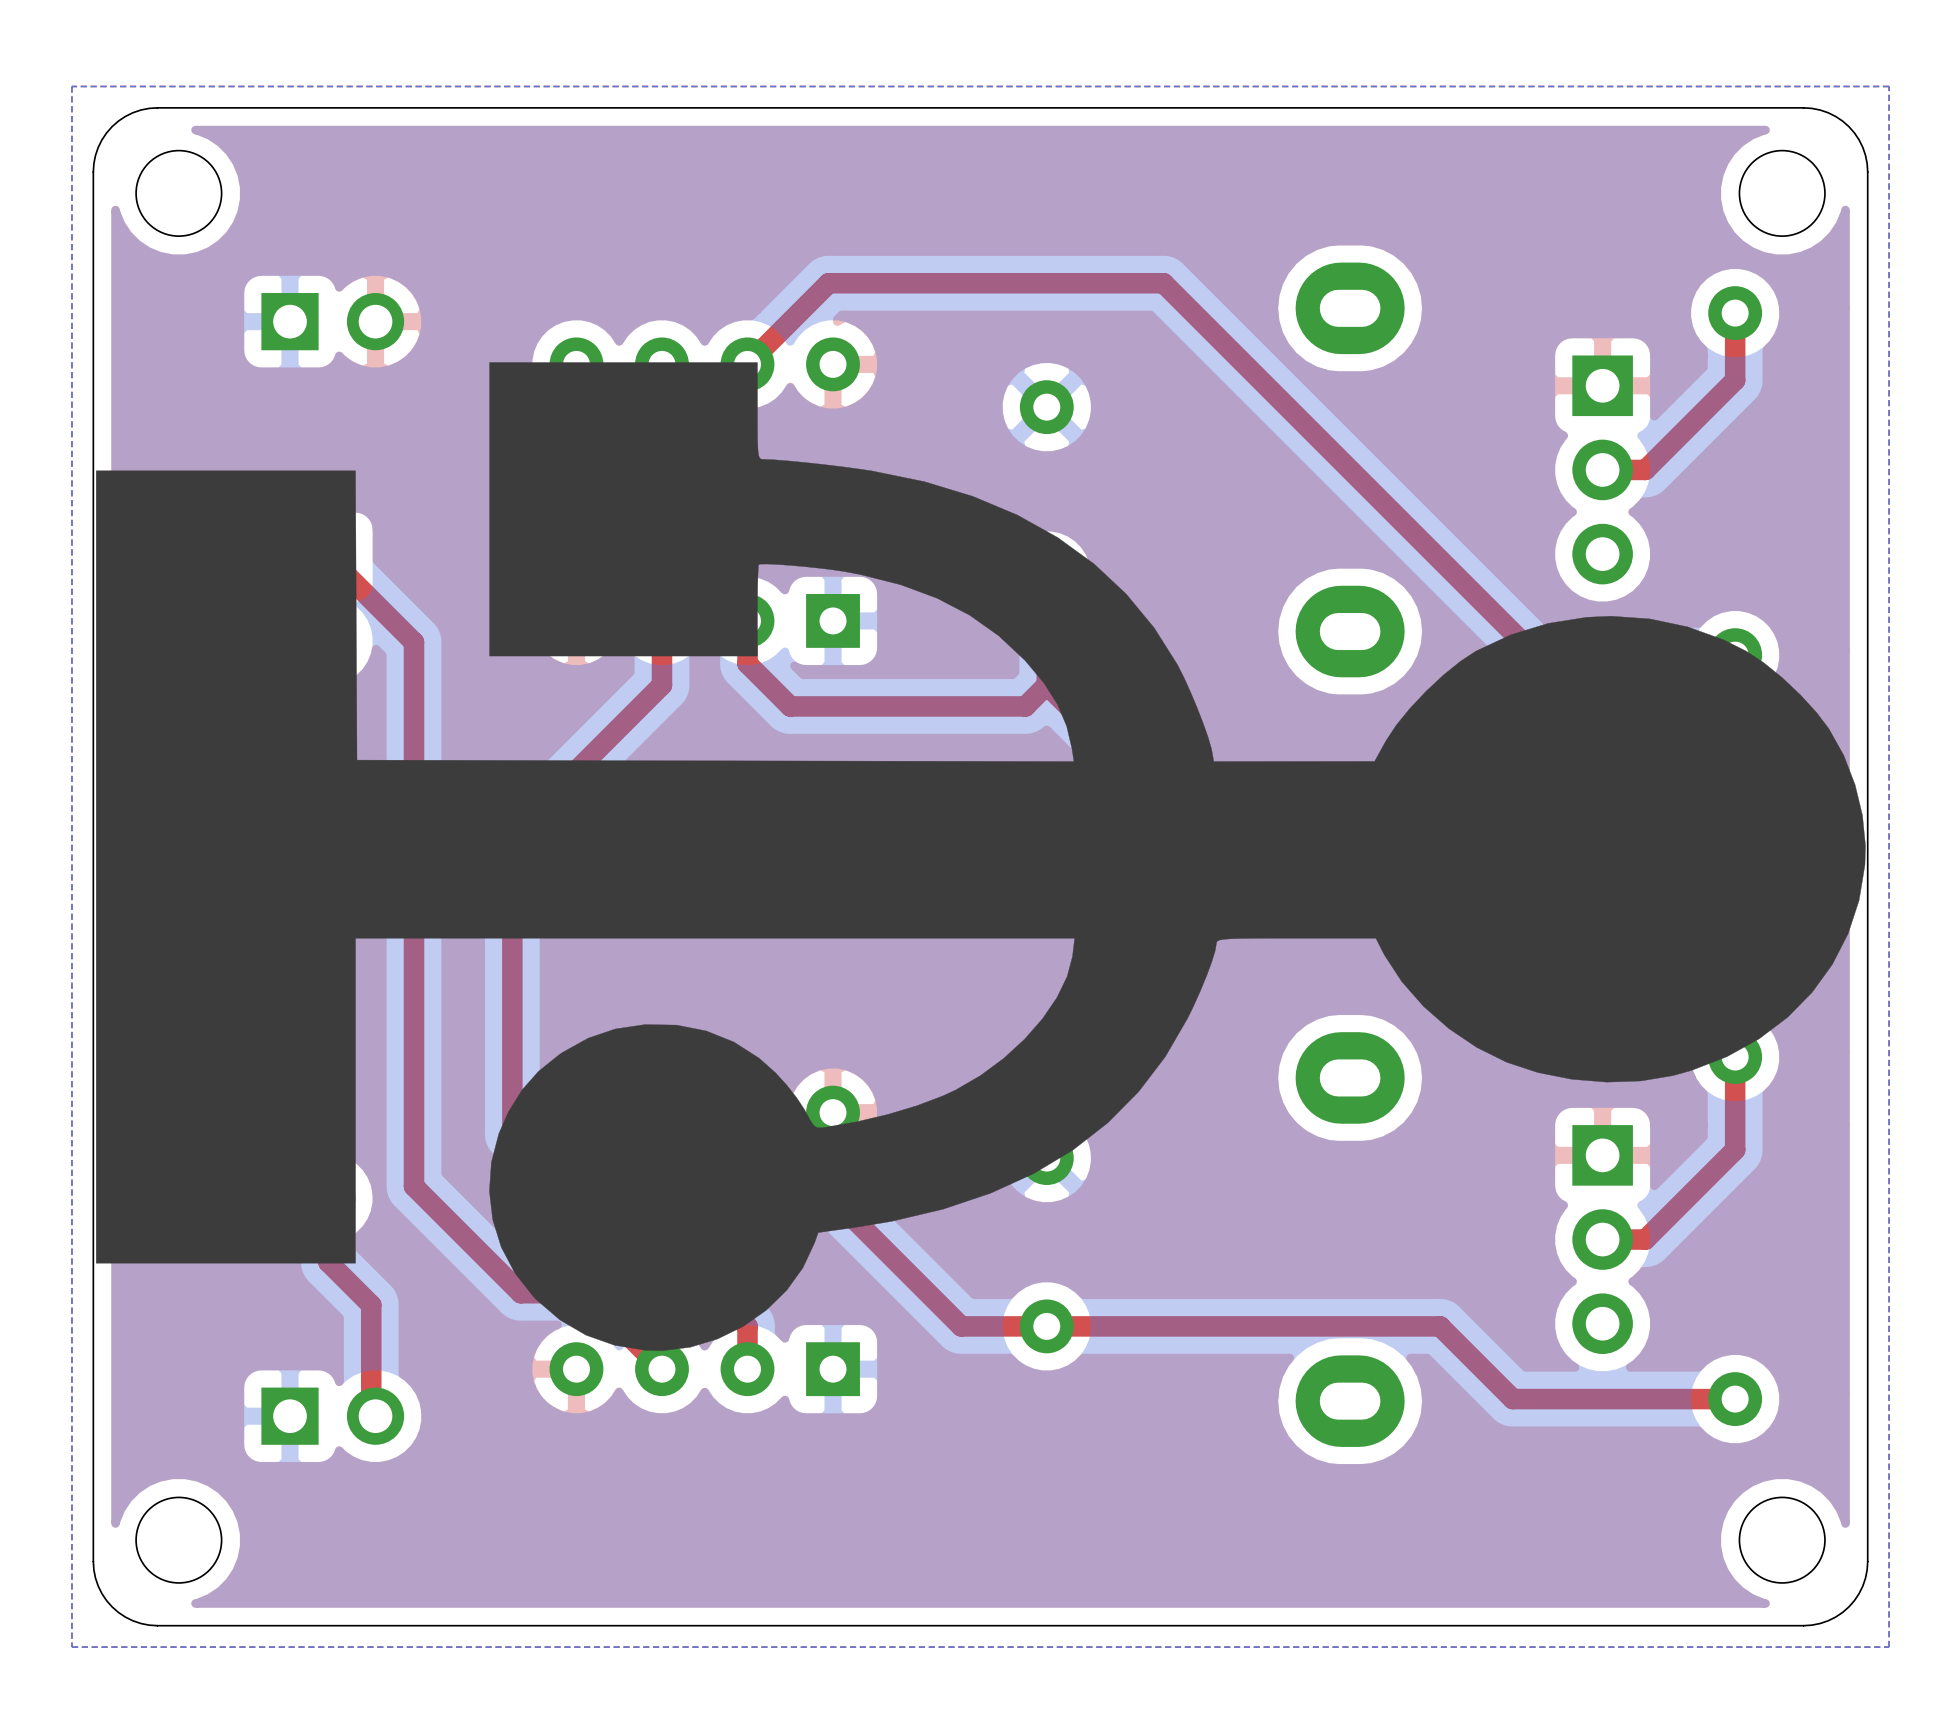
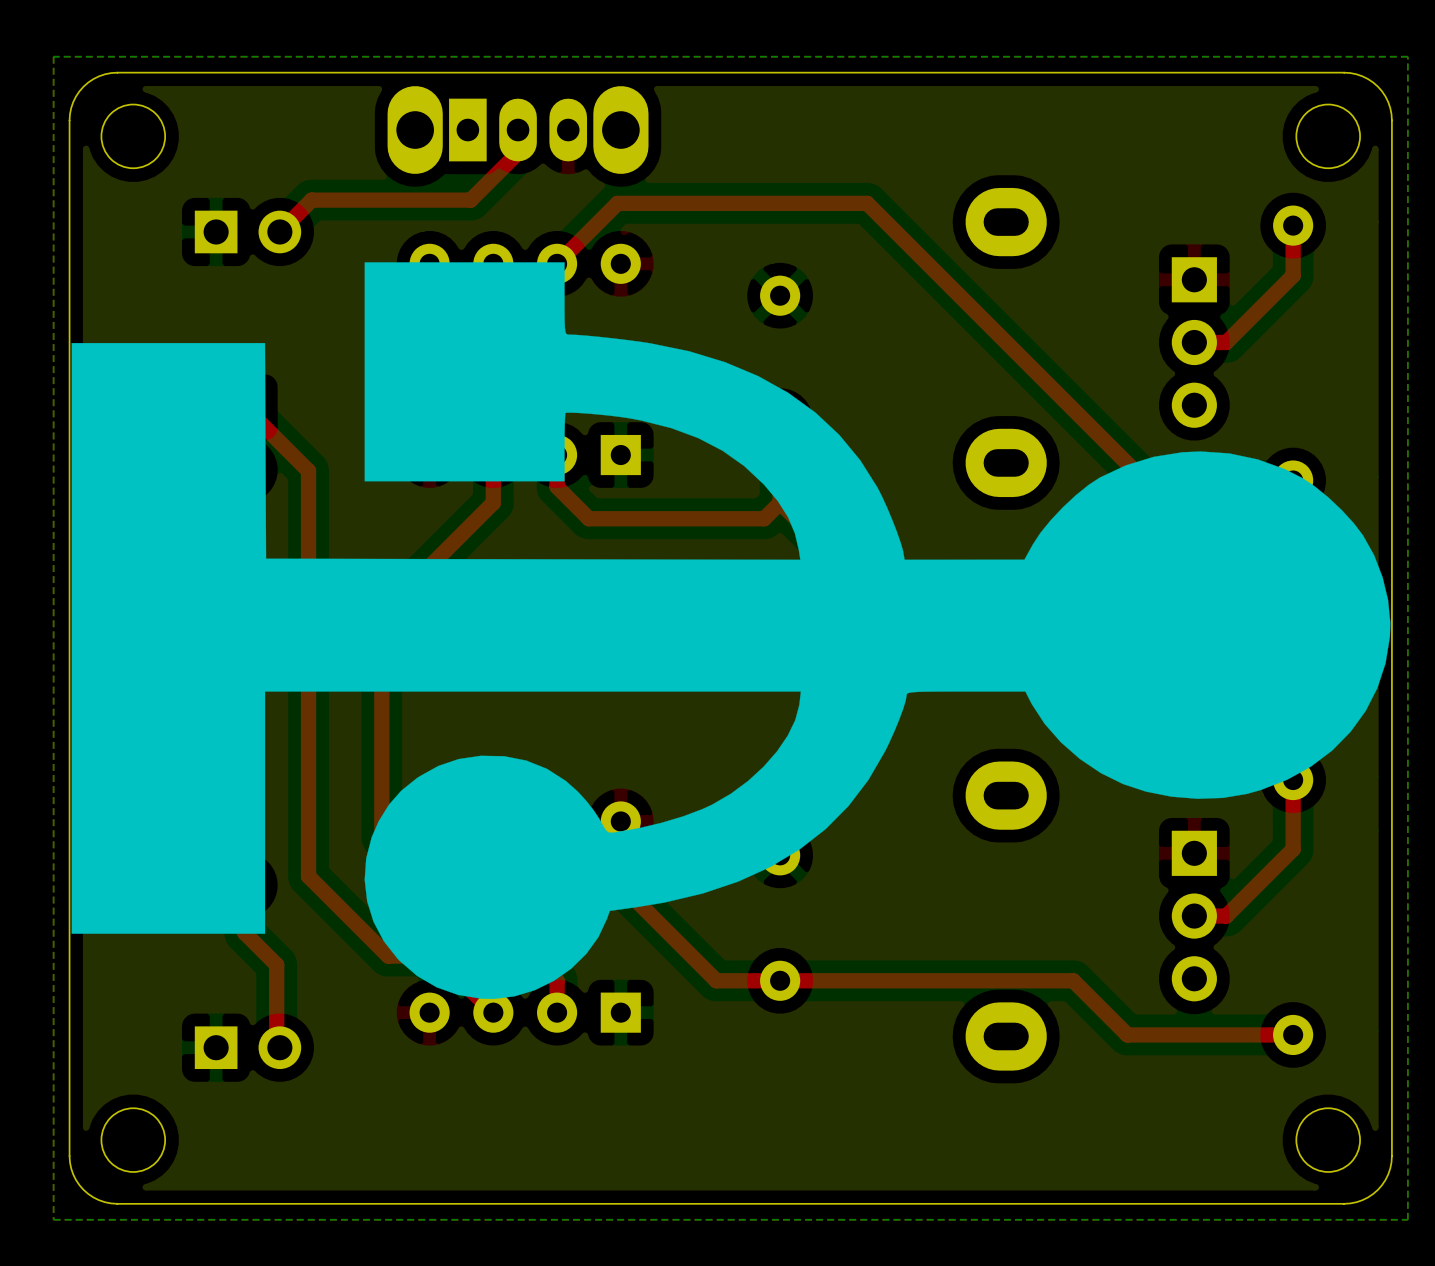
top track: none -> (518, 130) (518, 152) (470, 200) (311, 200) (279, 231)
part: none -> (518, 130)

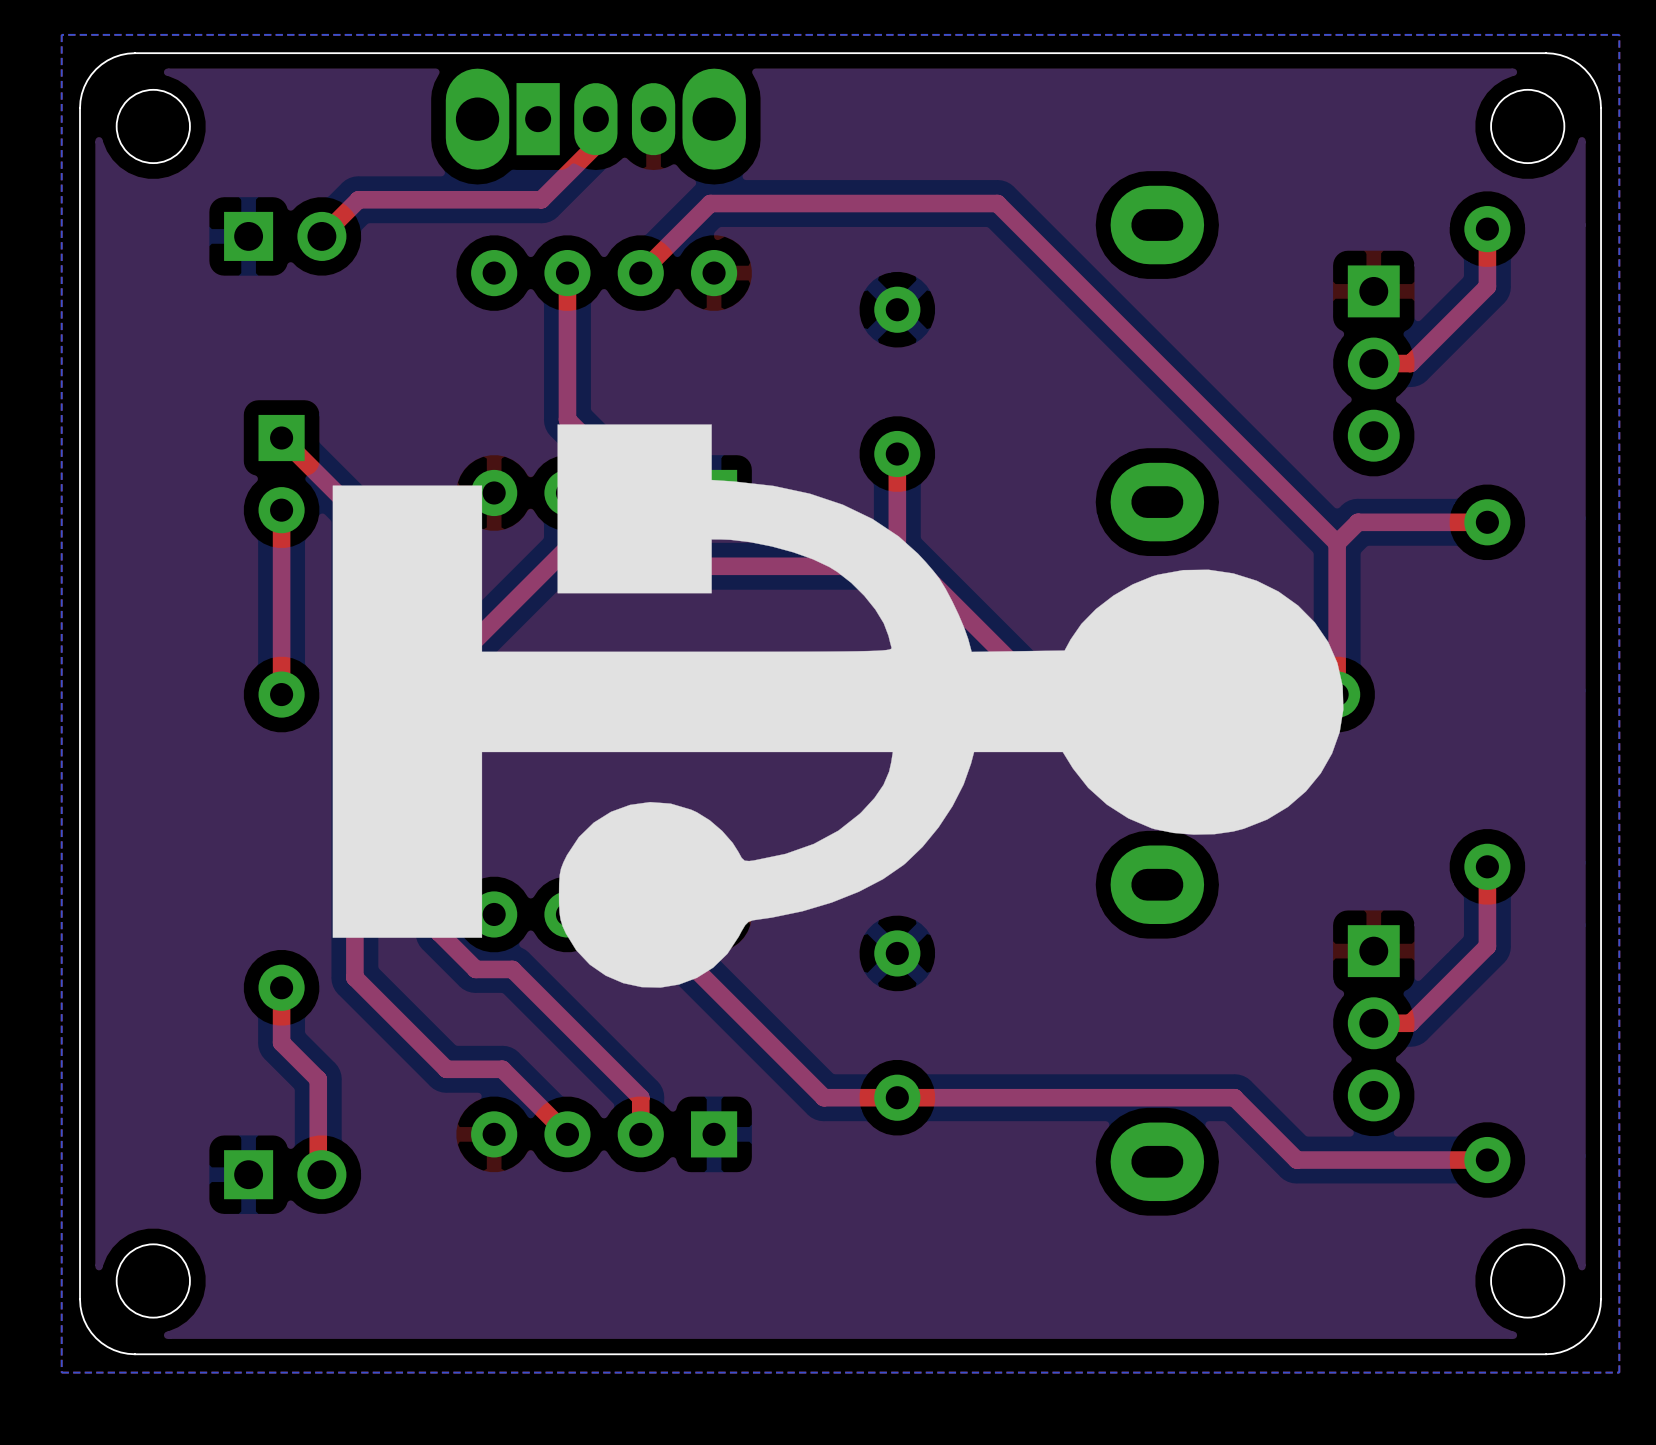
drawing shape: [71, 262, 1391, 1000] -> [332, 424, 1344, 988]

